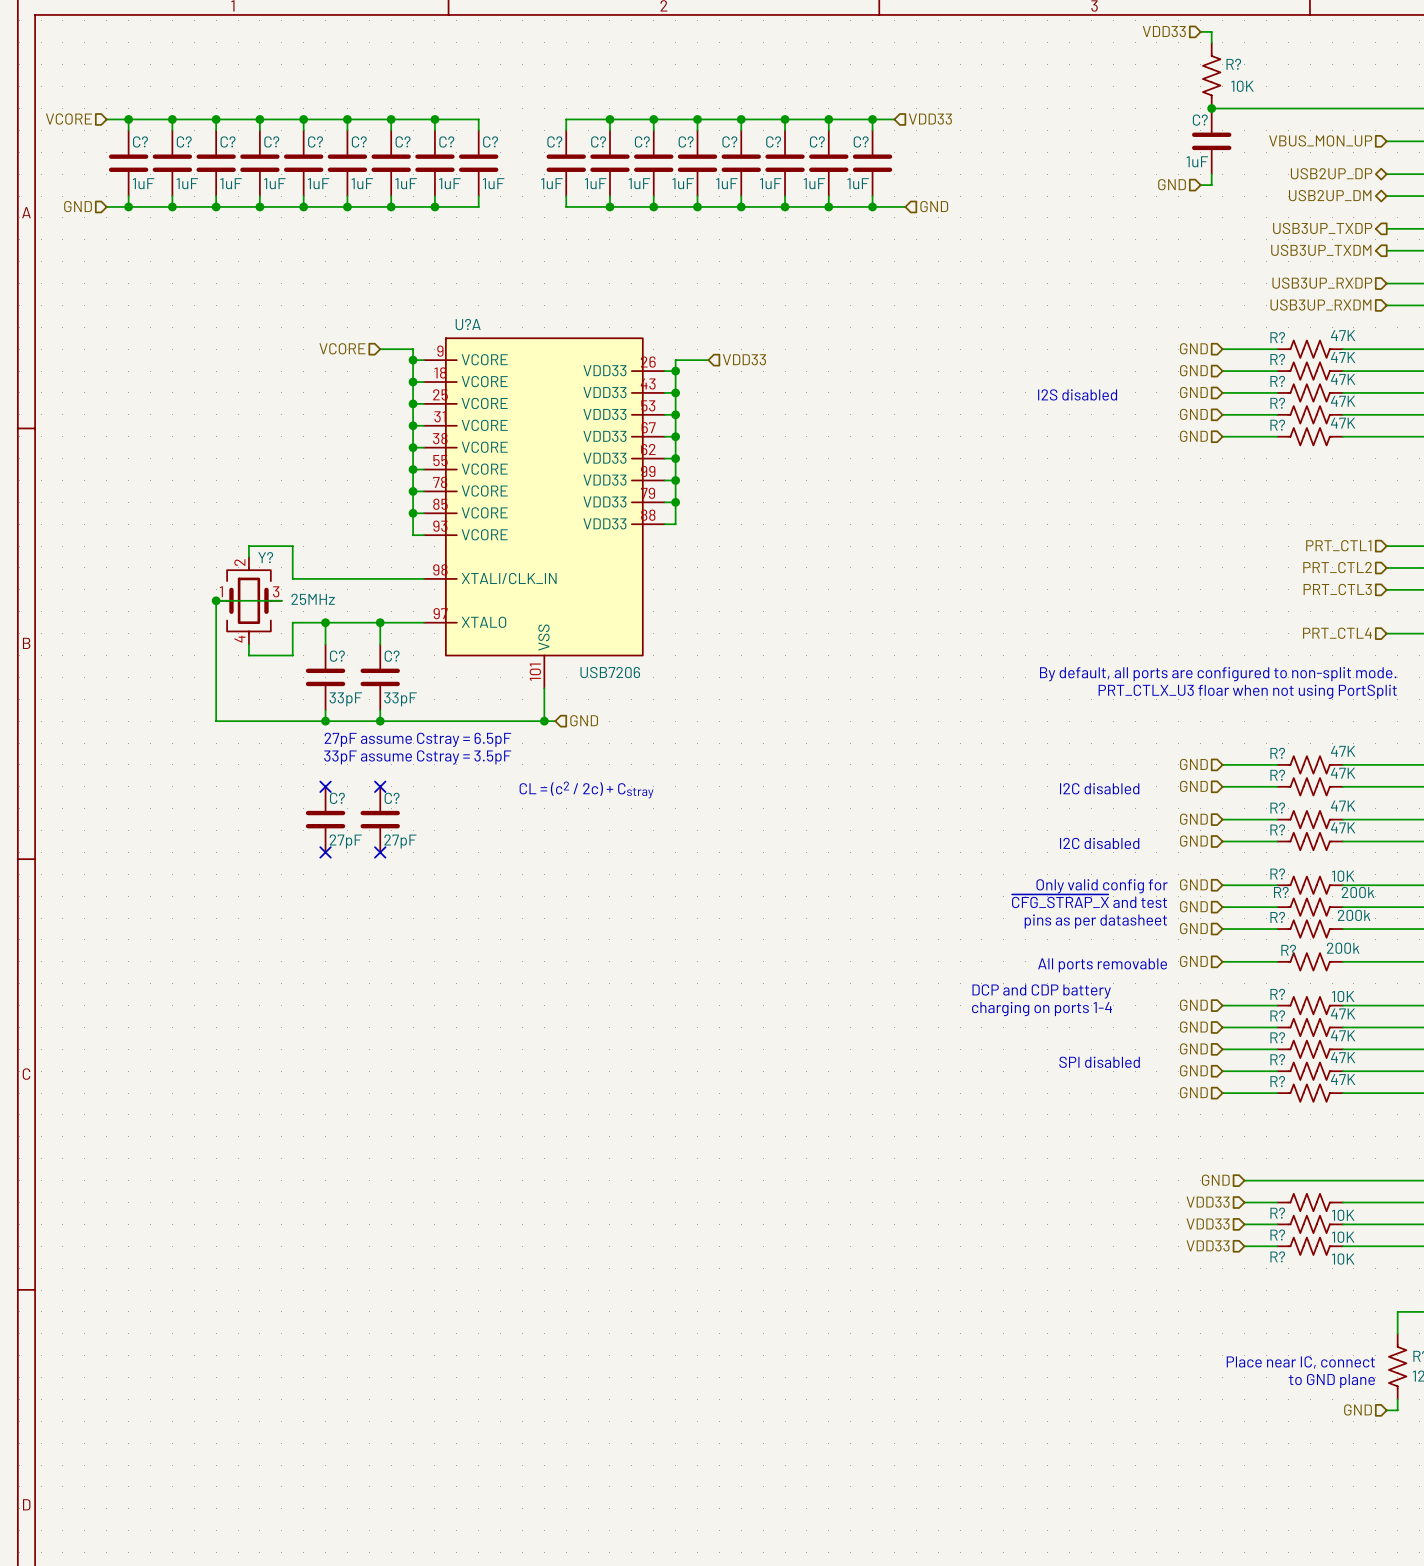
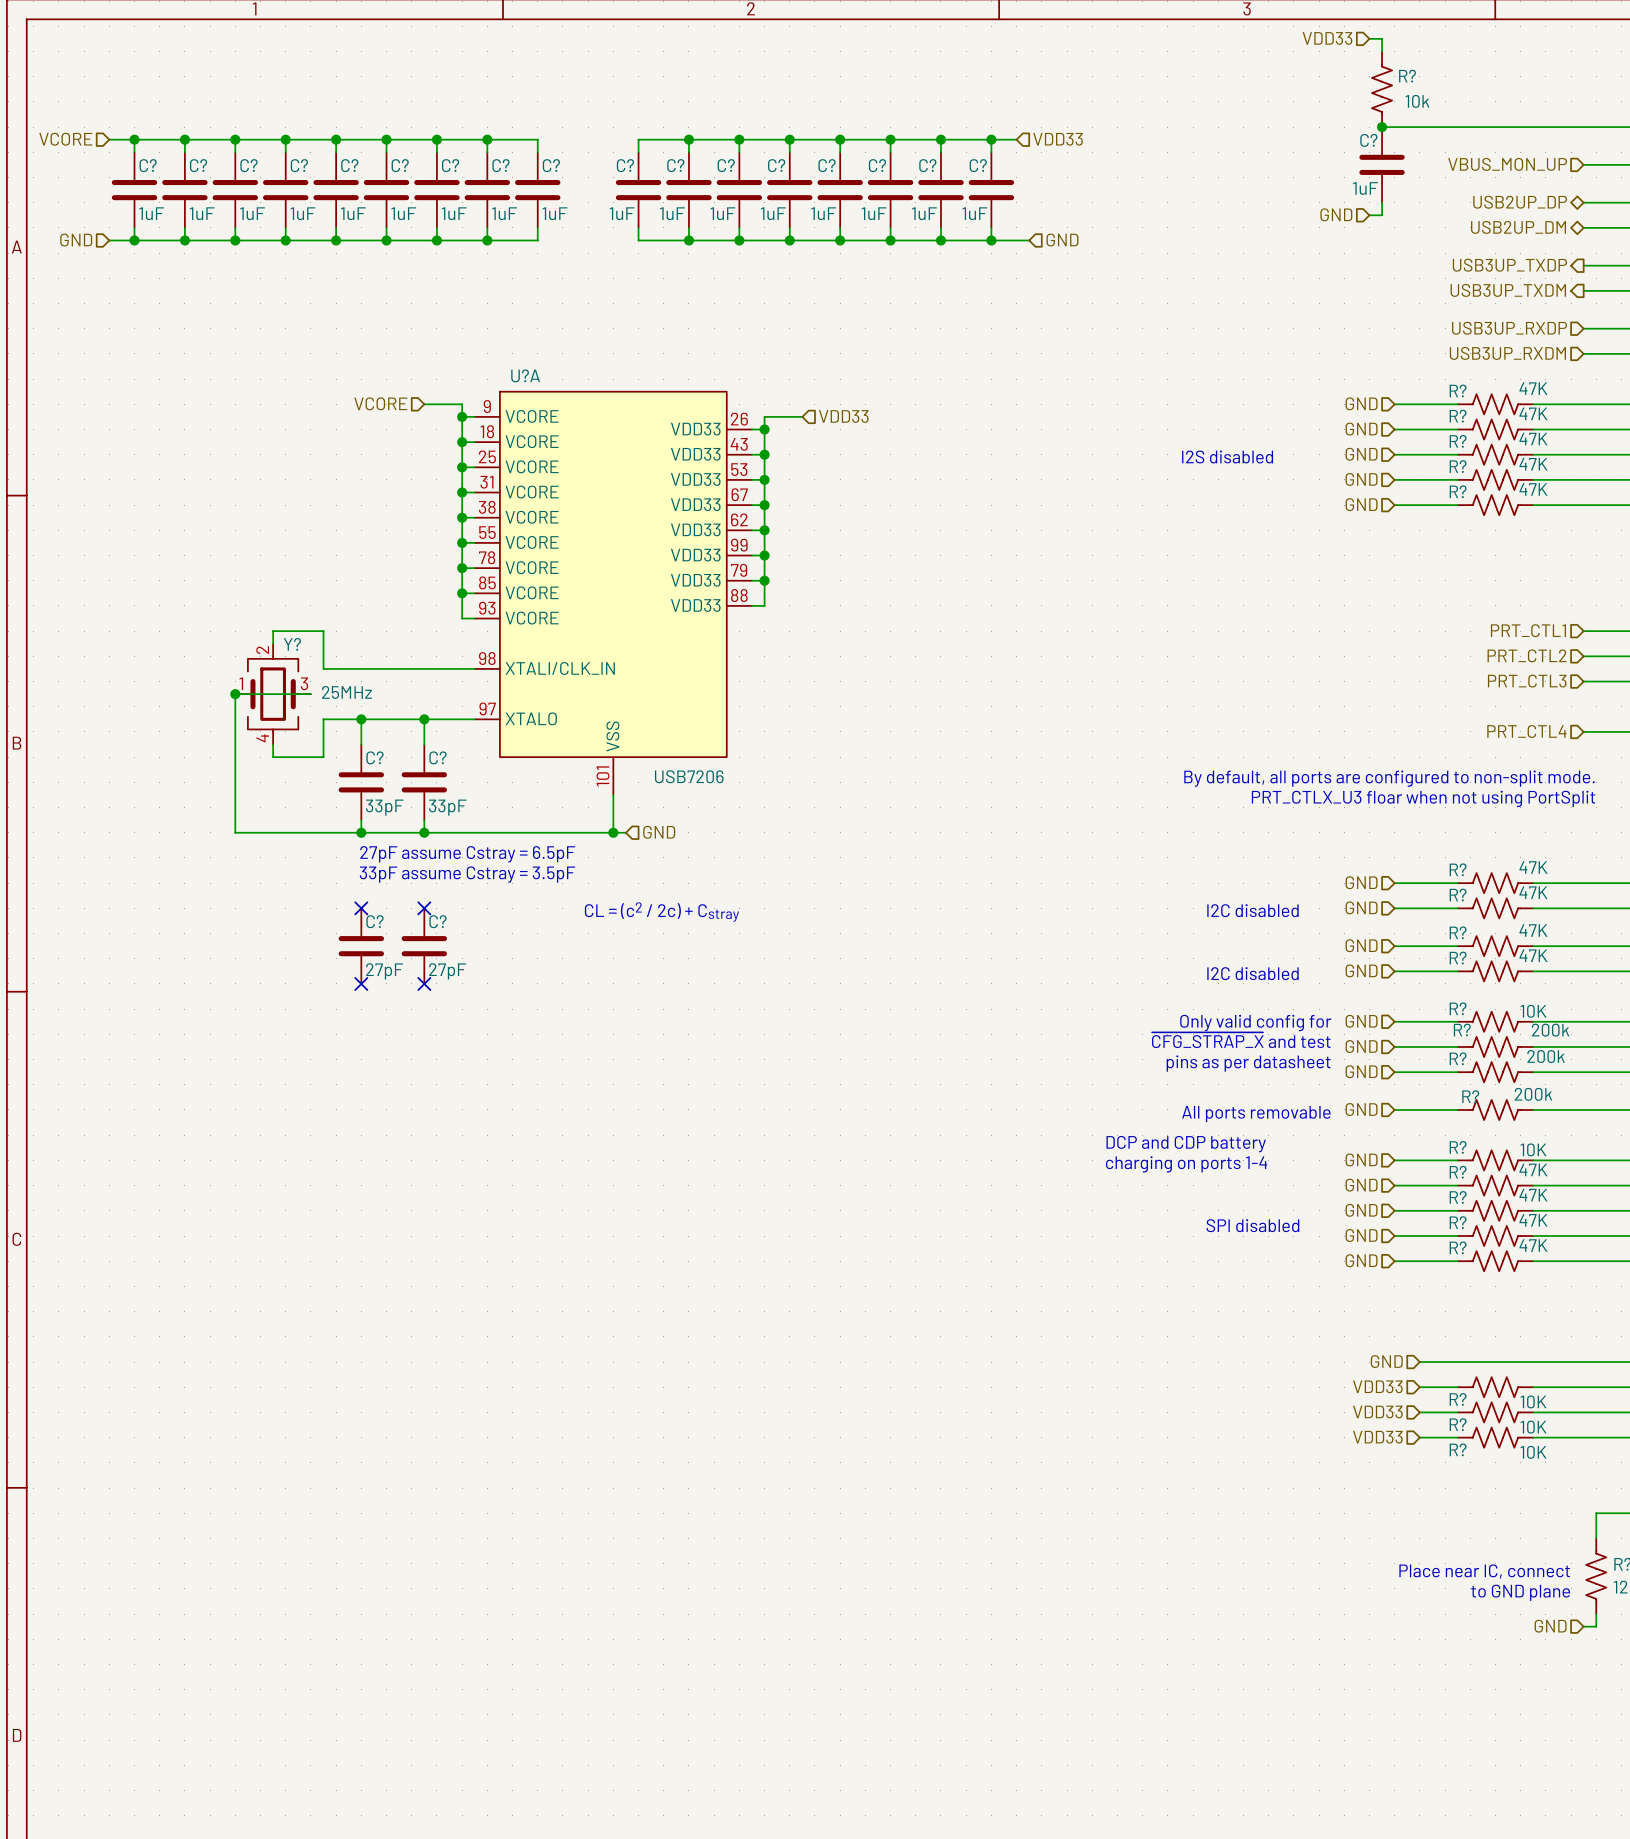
R? text: 10K (1242, 86) -> 10k (1417, 101)
U?A symbol: [424, 338, 665, 689] -> [474, 391, 752, 795]

